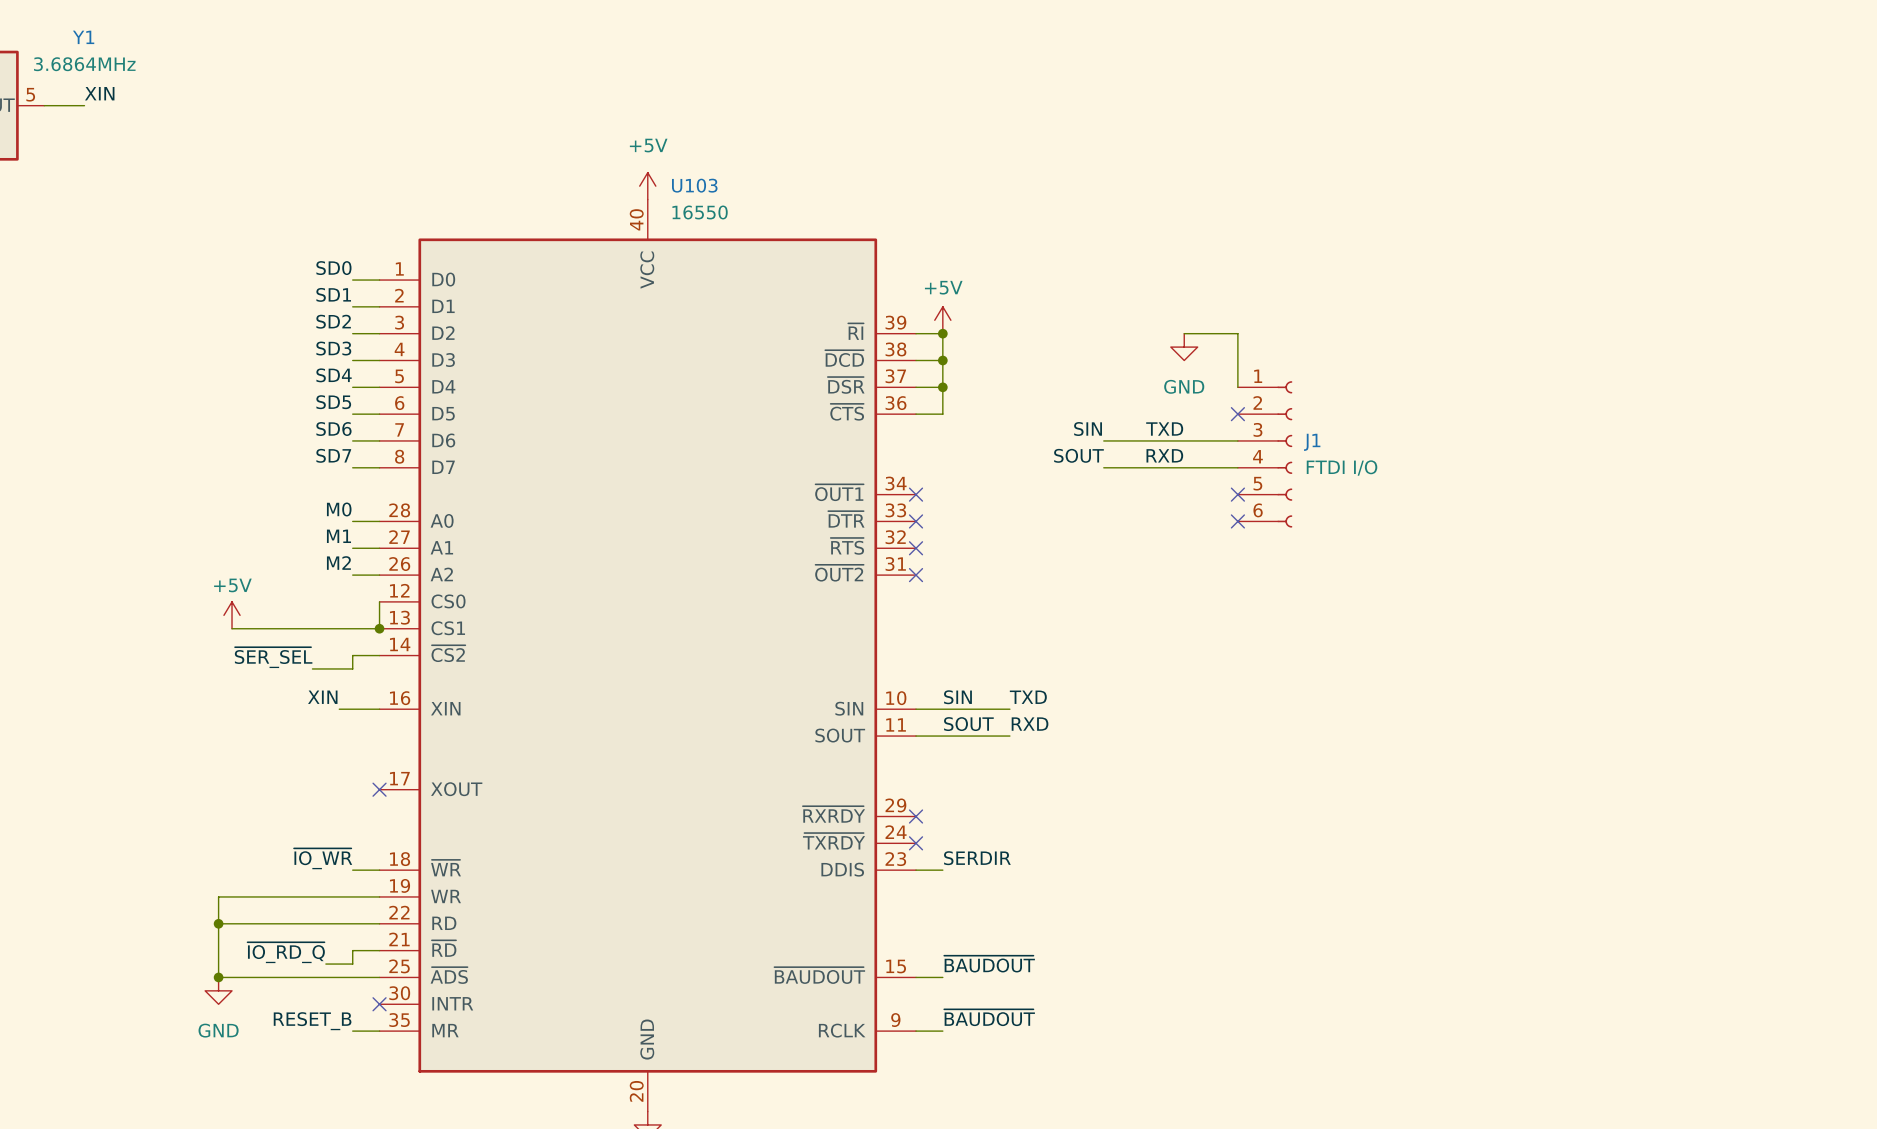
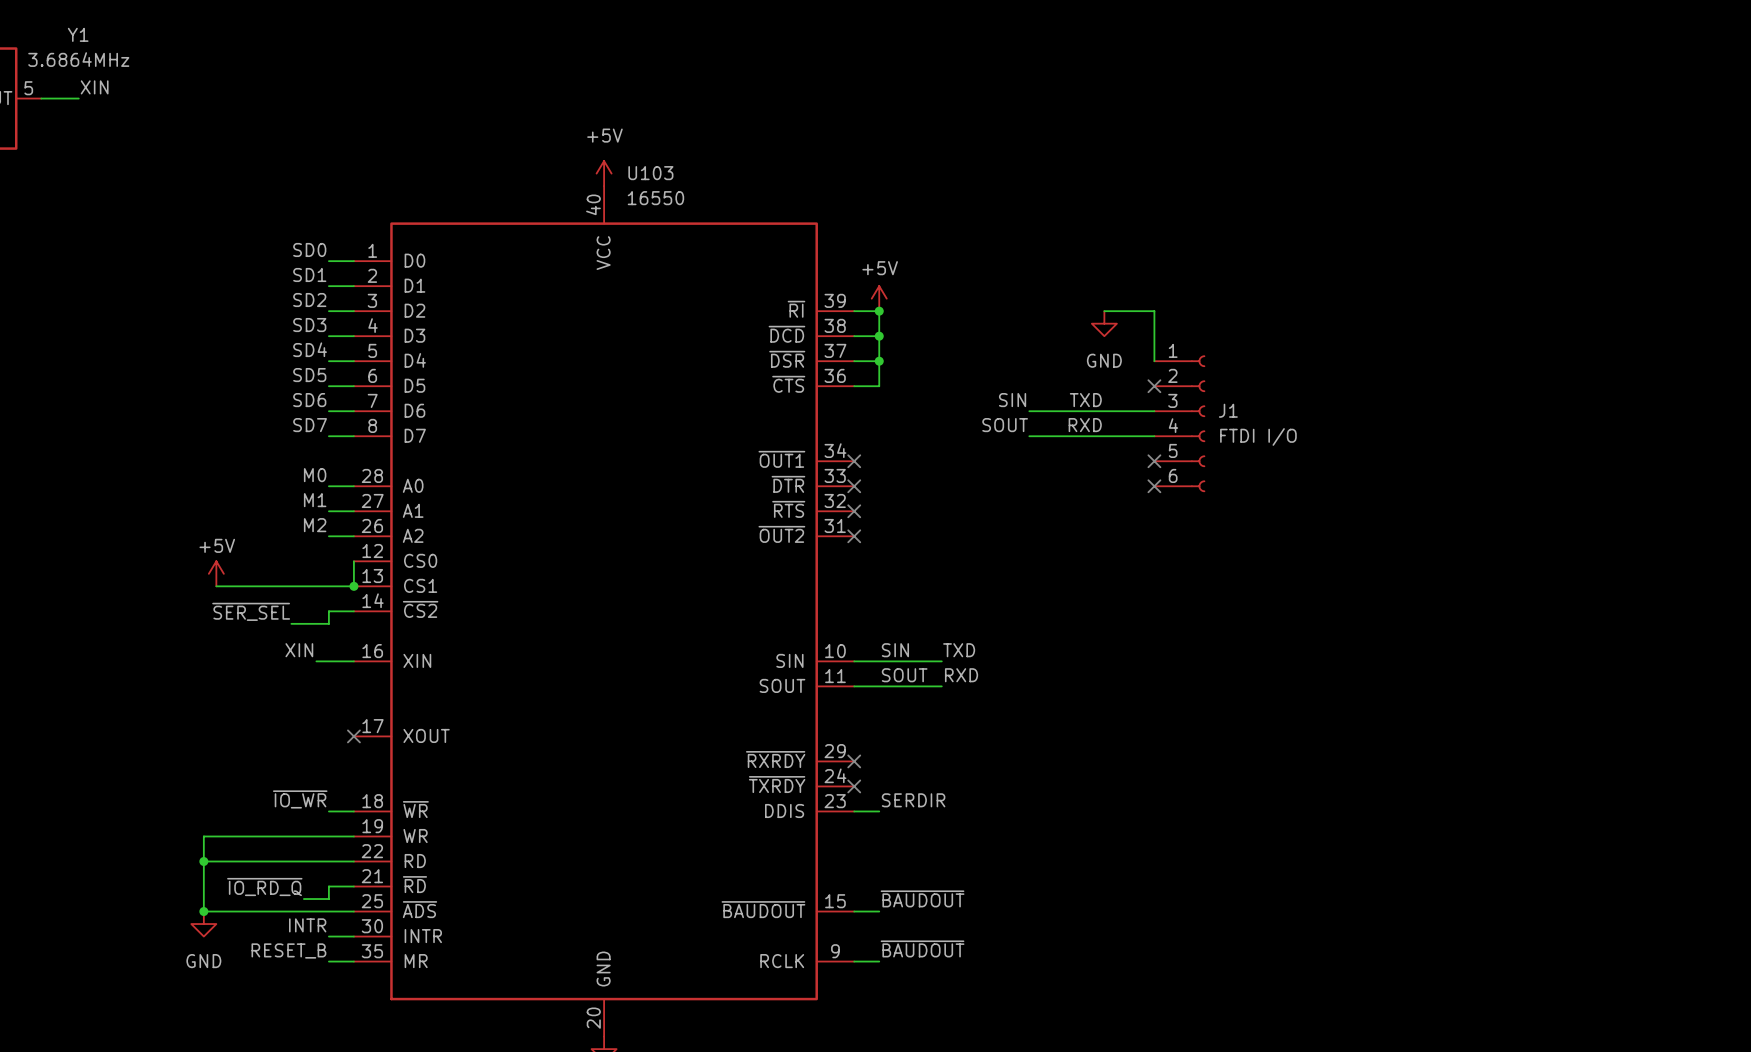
label: none -> INTR (307, 925)
wire: none -> (328, 936) (353, 936)
no-connect mark: (379, 1004) -> none

